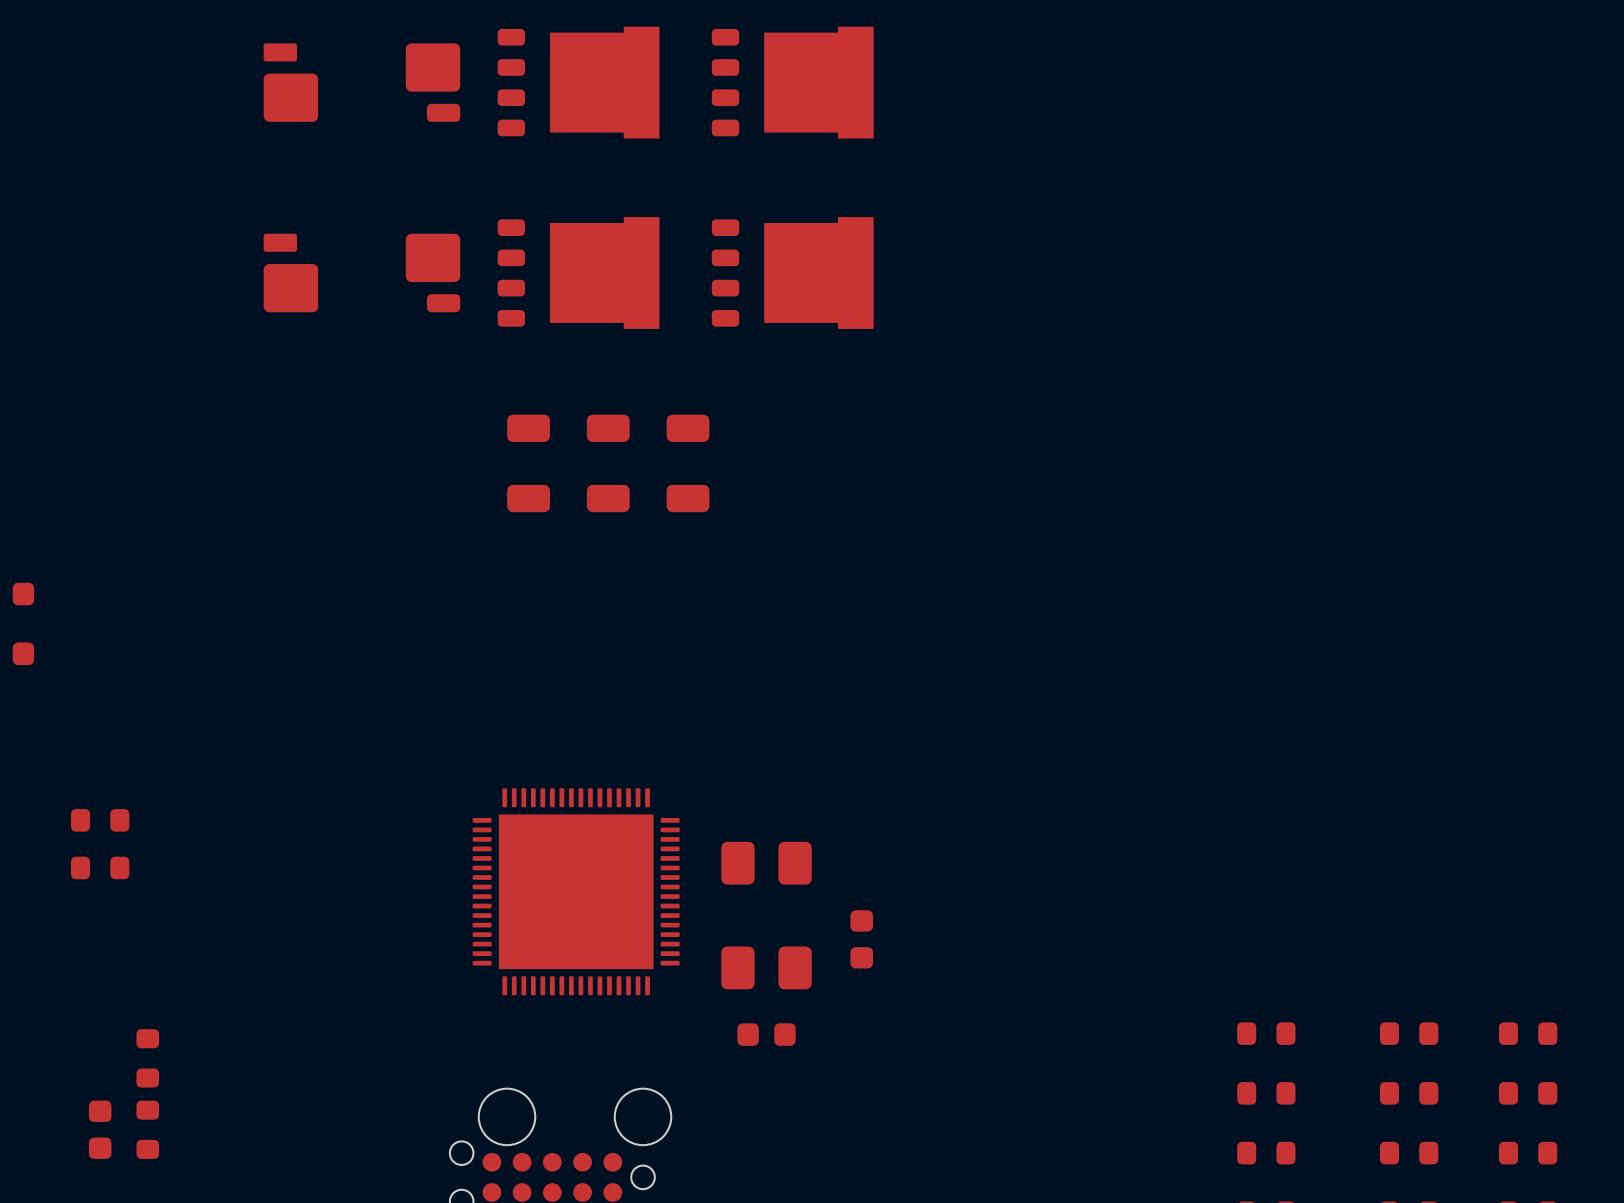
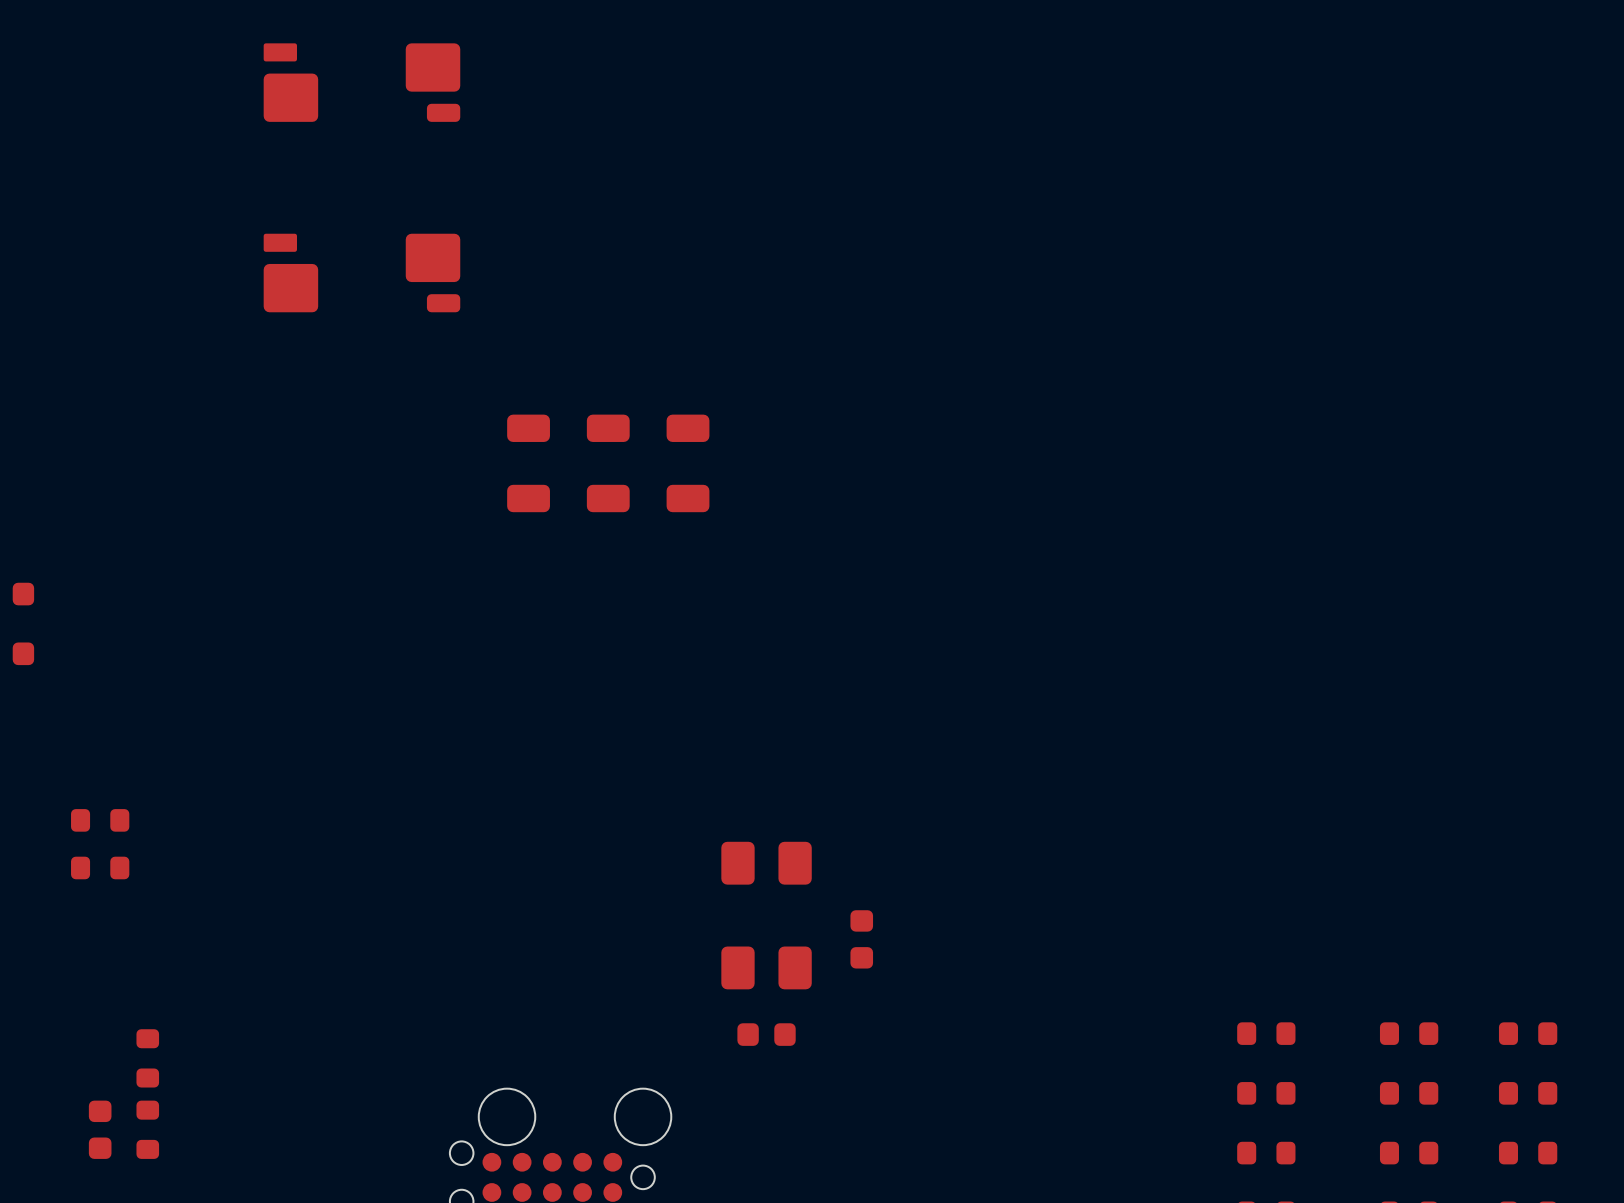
part: (578, 82) -> none
part: (792, 82) -> none
part: (578, 273) -> none
part: (792, 273) -> none
part: (576, 891) -> none

